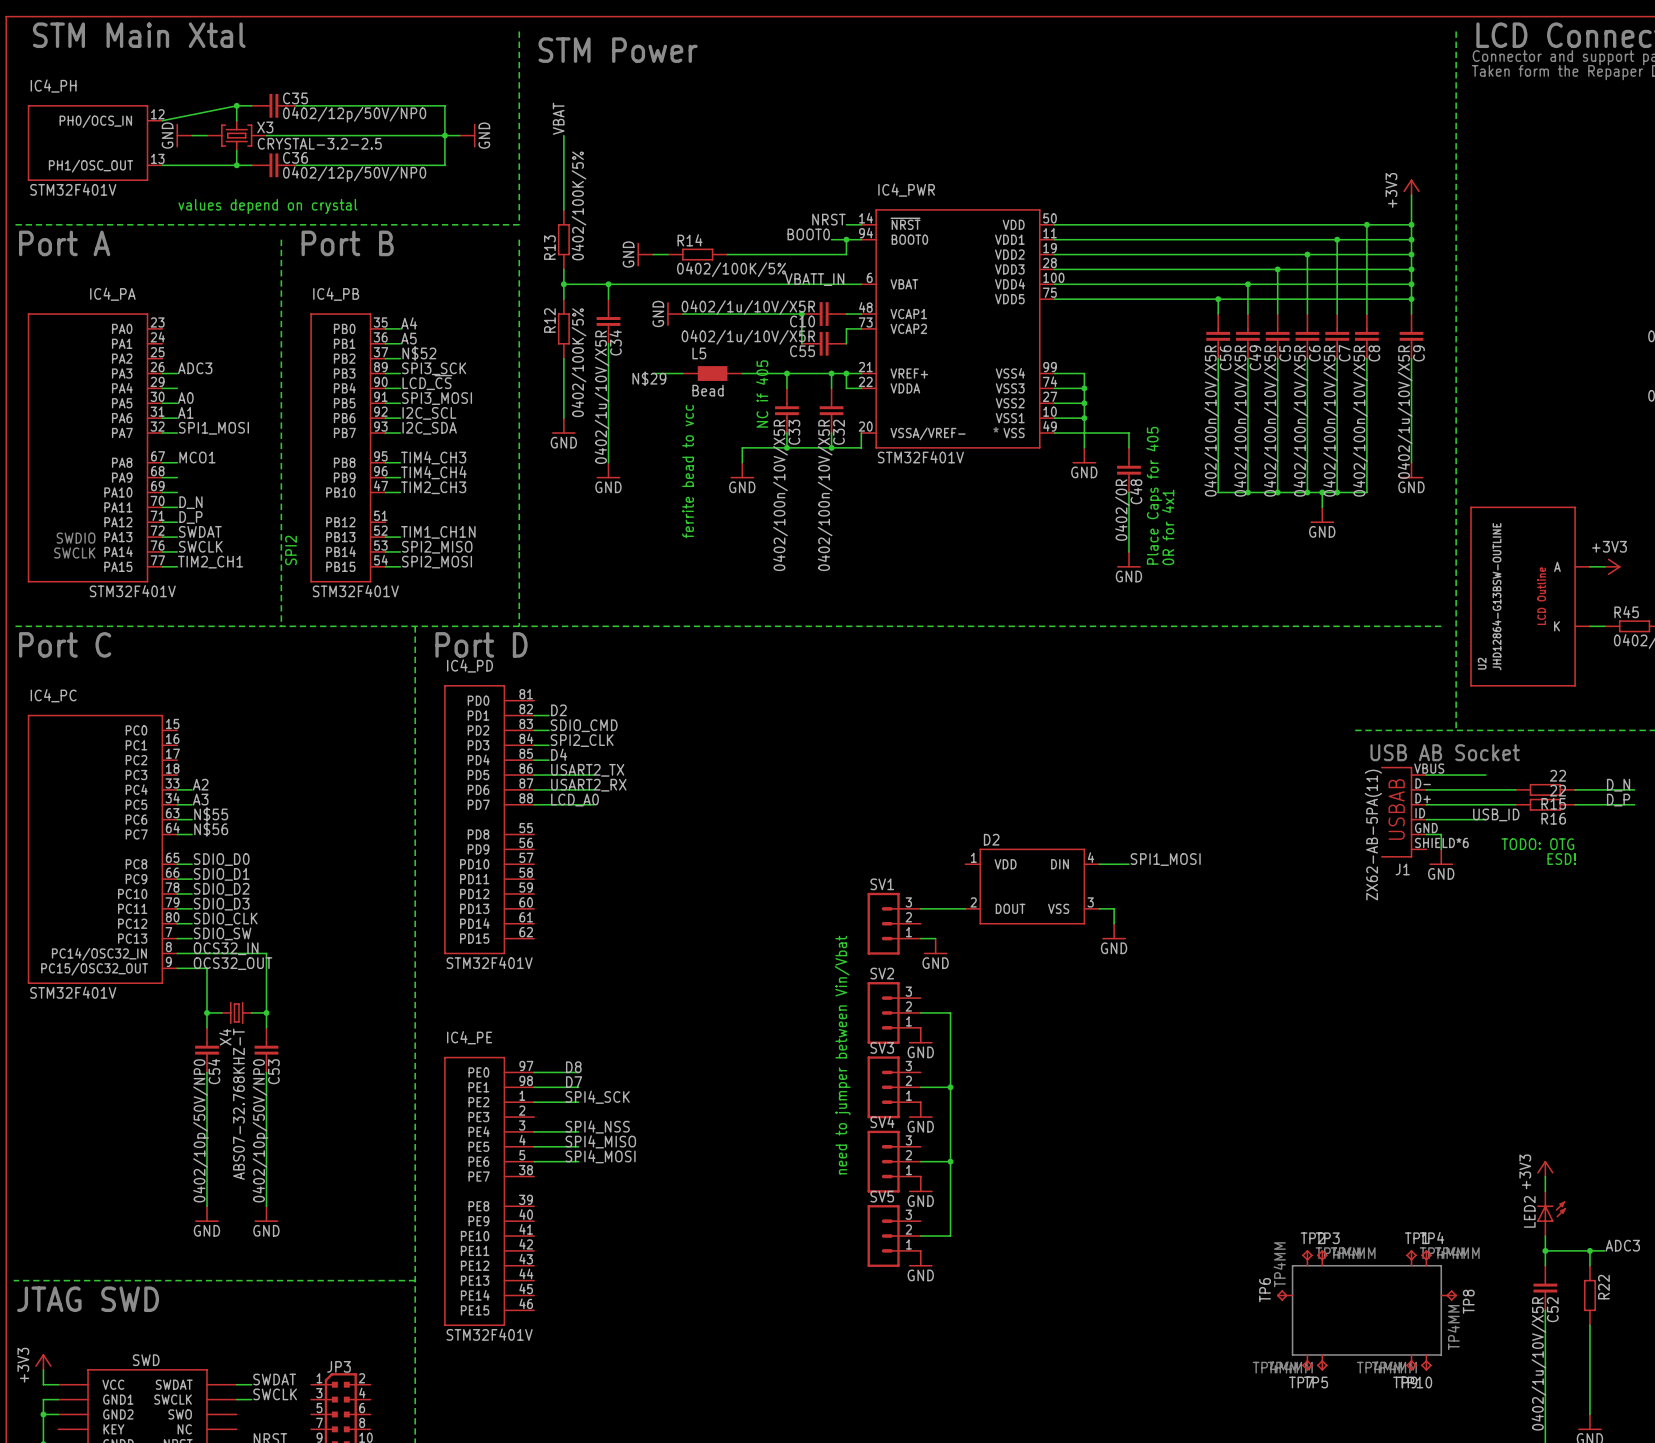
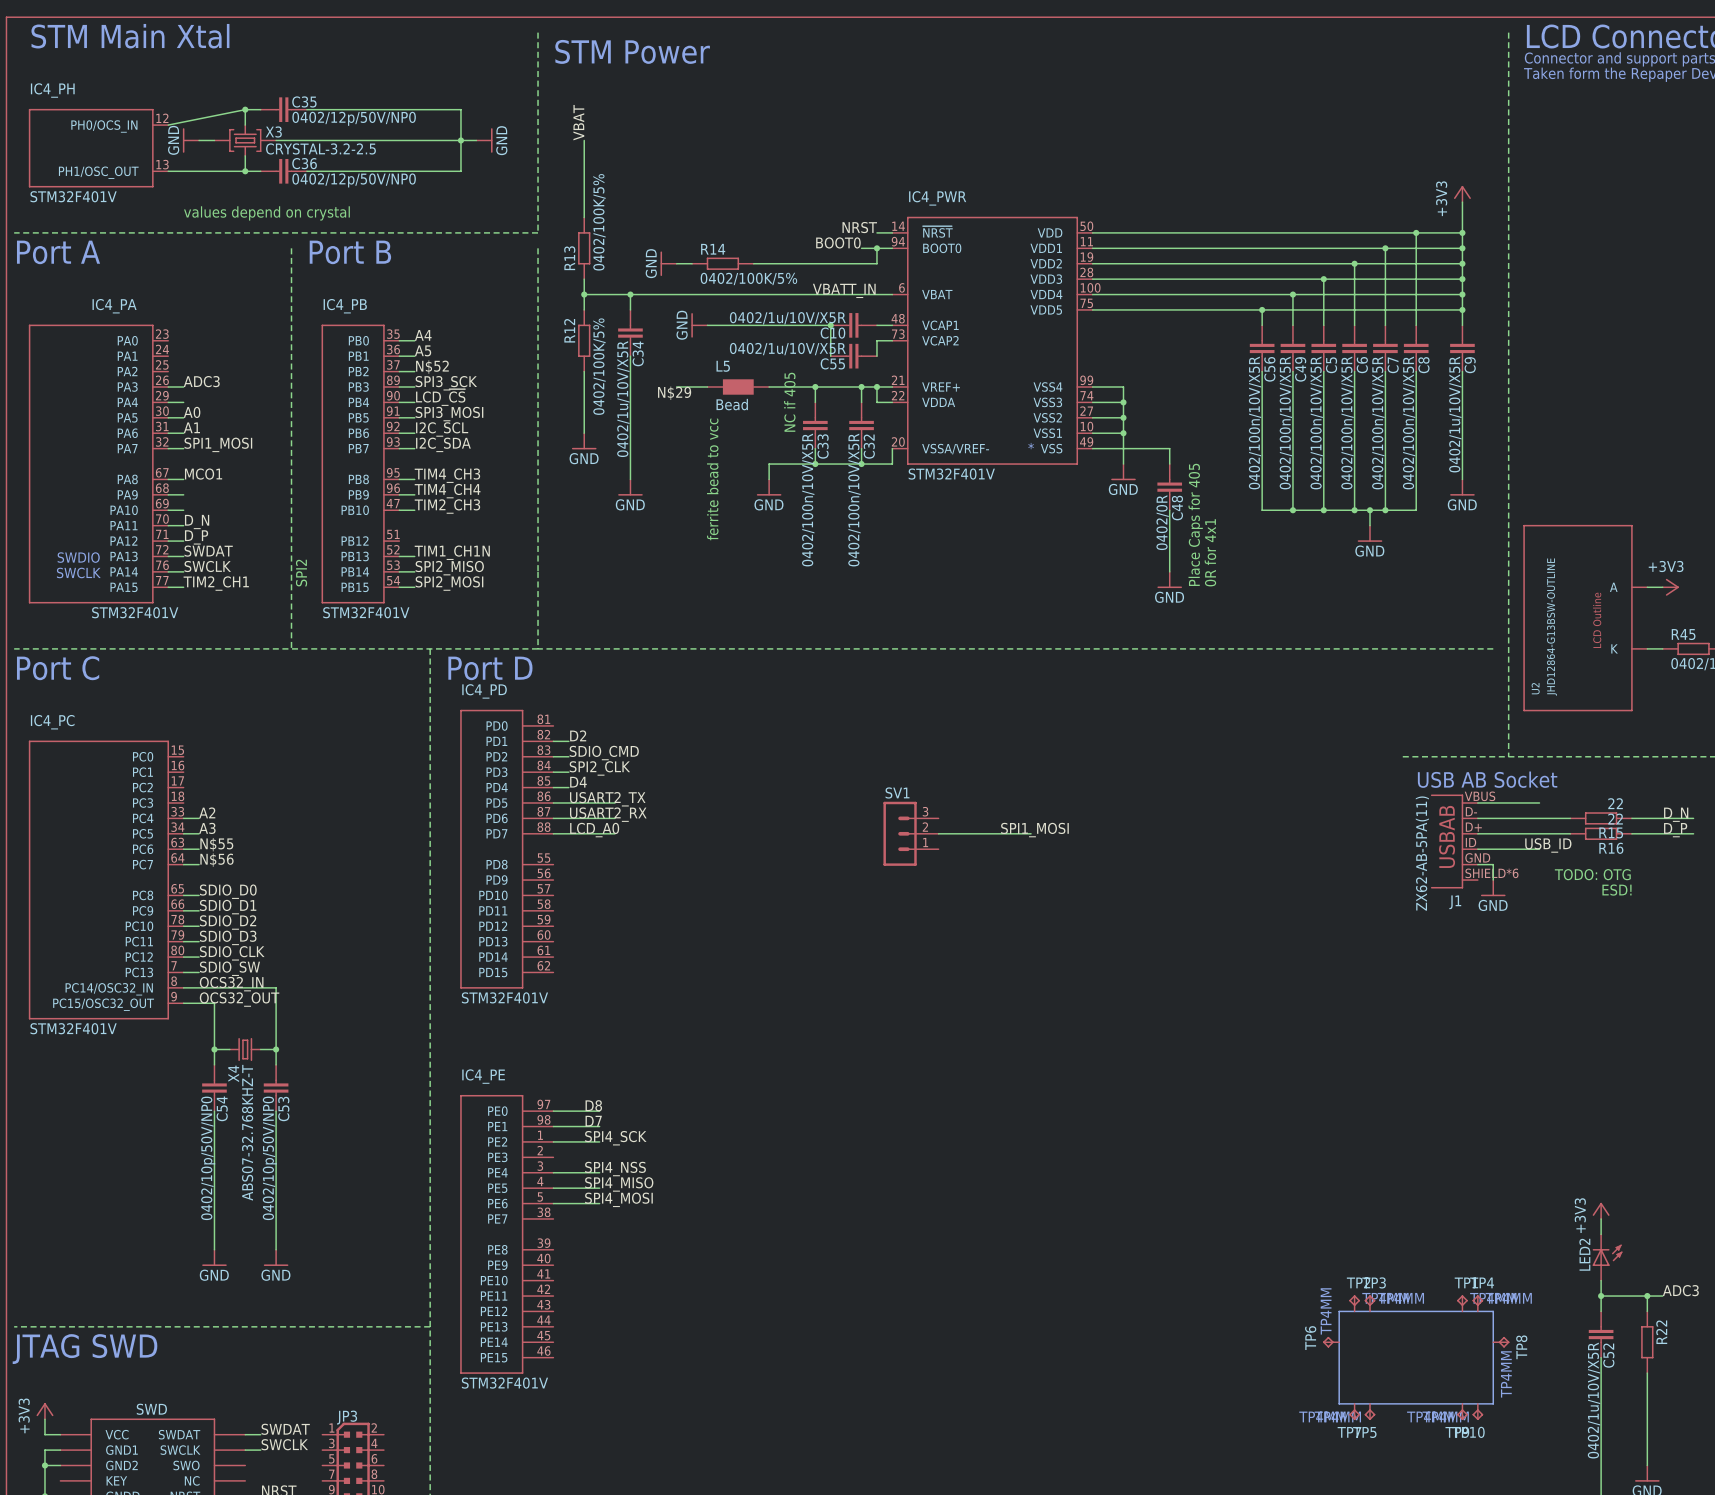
label: none -> SPI1_MOSI (1034, 830)
wire: none -> (938, 833) (1031, 833)
label: SPI1_MOSI (1165, 859) -> none
wire: (1099, 864) (1128, 864) -> none
D2: (1032, 886) -> none
wire: (920, 908) (965, 908) -> none
wire: (1099, 908) (1114, 908) (1114, 923) -> none
SV1 position: (894, 923) -> (911, 833)
power symbol: GND (1114, 931) -> none
wire: (920, 938) (935, 938) -> none
power symbol: GND (935, 946) -> none
SV2: (894, 1012) -> none
wire: (920, 1012) (950, 1012) (950, 1236) (920, 1236) -> none
power symbol: GND (920, 1035) -> none
text: need to jumper between Vin/Vbat (842, 1055) -> none
SV3: (894, 1087) -> none
wire: (920, 1087) (950, 1087) -> none
junction: (950, 1087) -> none
power symbol: GND (920, 1109) -> none
SV4: (894, 1161) -> none
wire: (920, 1161) (950, 1161) -> none
junction: (950, 1161) -> none
power symbol: GND (920, 1184) -> none
SV5: (894, 1236) -> none
power symbol: GND (920, 1258) -> none

